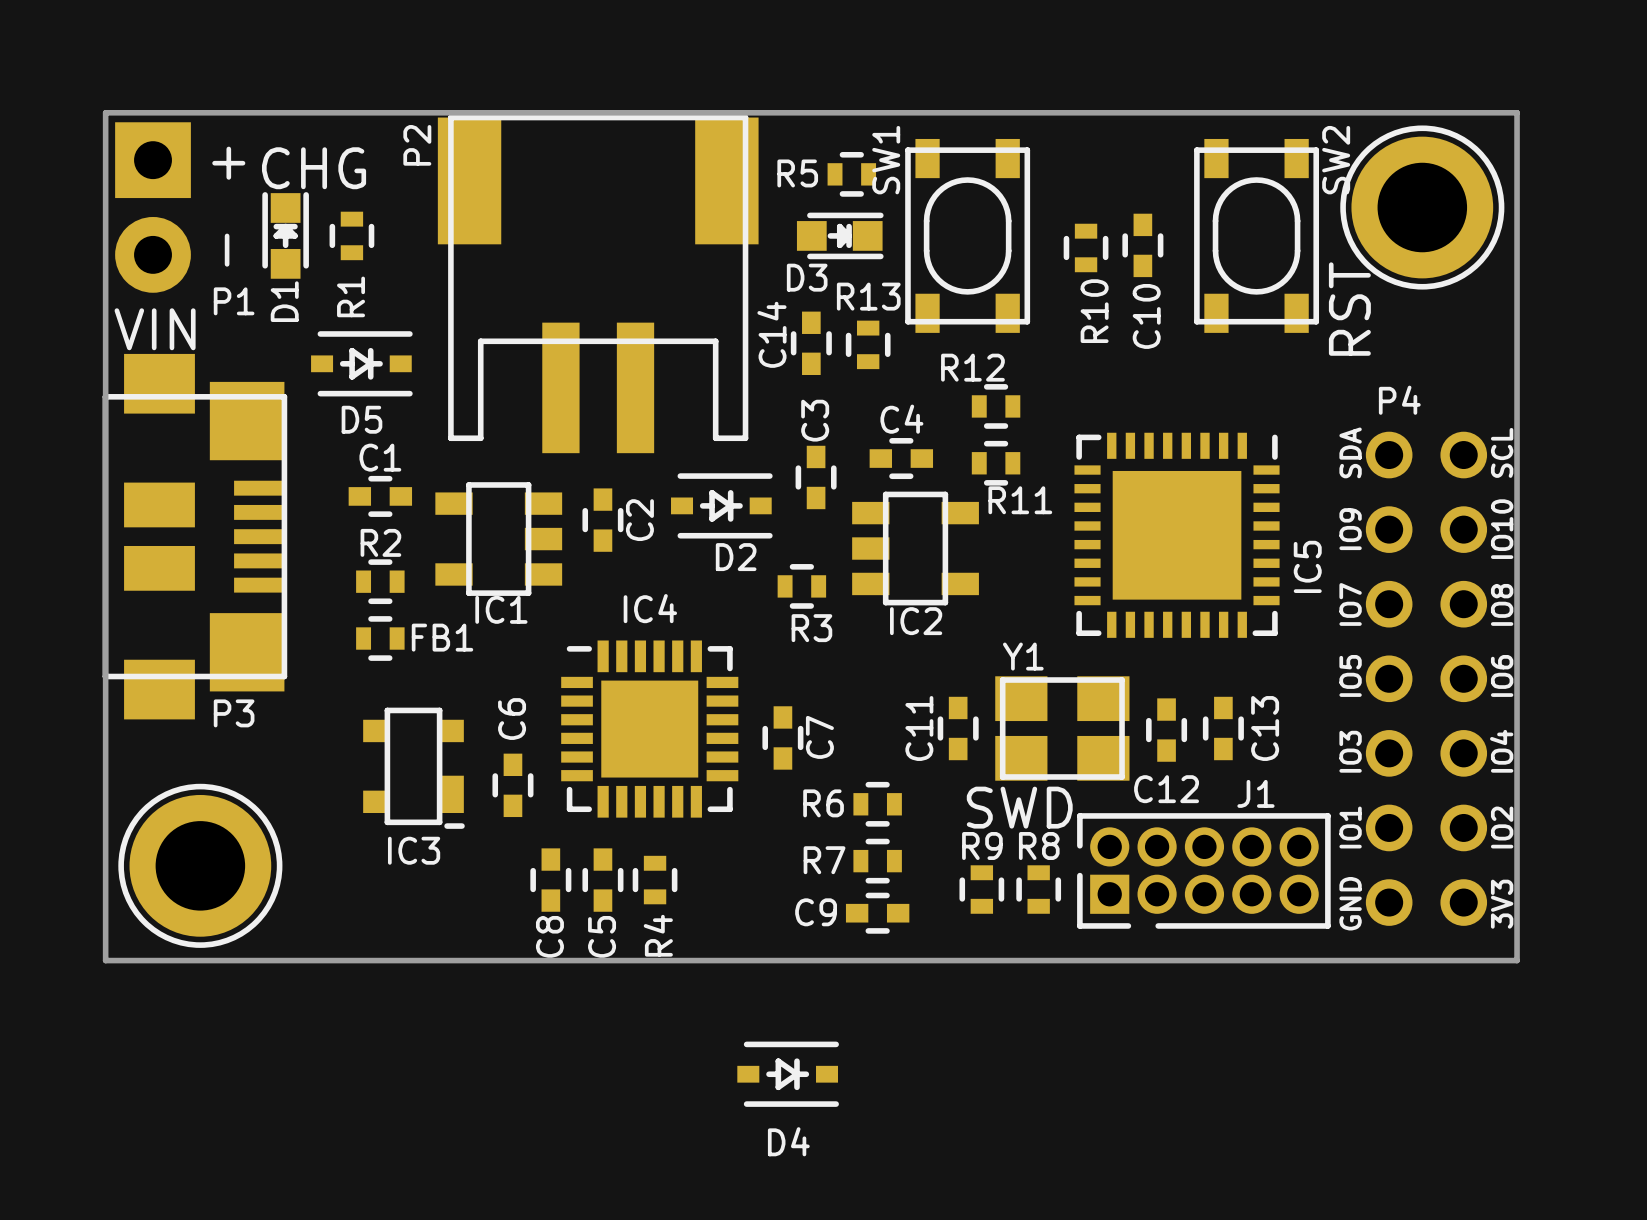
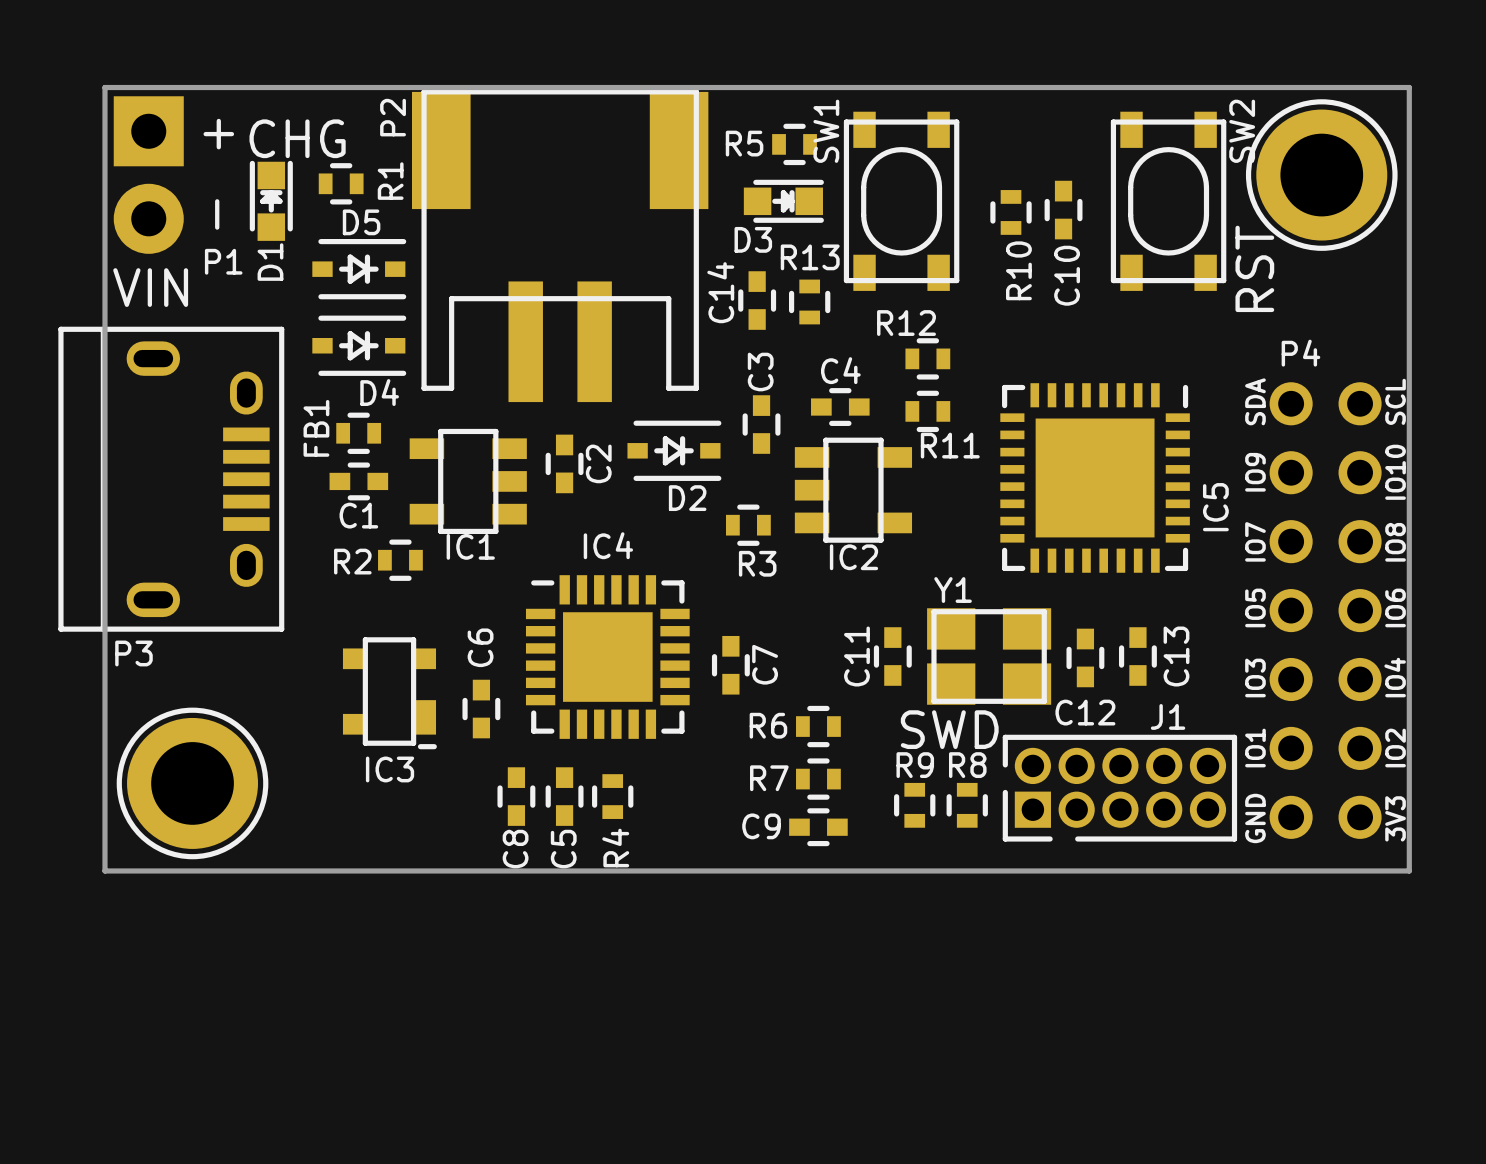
R1 rotation: 0° (351, 235) -> 90° clockwise (341, 183)
R1 name position: R1 (351, 296) -> R1 (390, 181)
P3 footprint: [102, 353, 288, 720] -> [58, 326, 285, 632]
D5 position: (361, 363) -> (359, 269)
D5 name position: D5 (361, 419) -> D5 (361, 222)
C1 name position: C1 (380, 457) -> C1 (358, 515)
C1 position: (380, 496) -> (358, 481)
R2 name position: R2 (380, 542) -> R2 (352, 561)
R2 position: (380, 581) -> (400, 560)
FB1 name rotation: 0° (442, 637) -> 90° counterclockwise (316, 428)
FB1 name position: FB1 (442, 637) -> FB1 (316, 428)
FB1 position: (380, 638) -> (358, 433)
P3 name position: P3 (234, 713) -> P3 (133, 653)
D4 position: (788, 1074) -> (359, 345)
D4 name position: D4 (788, 1141) -> D4 (379, 392)

